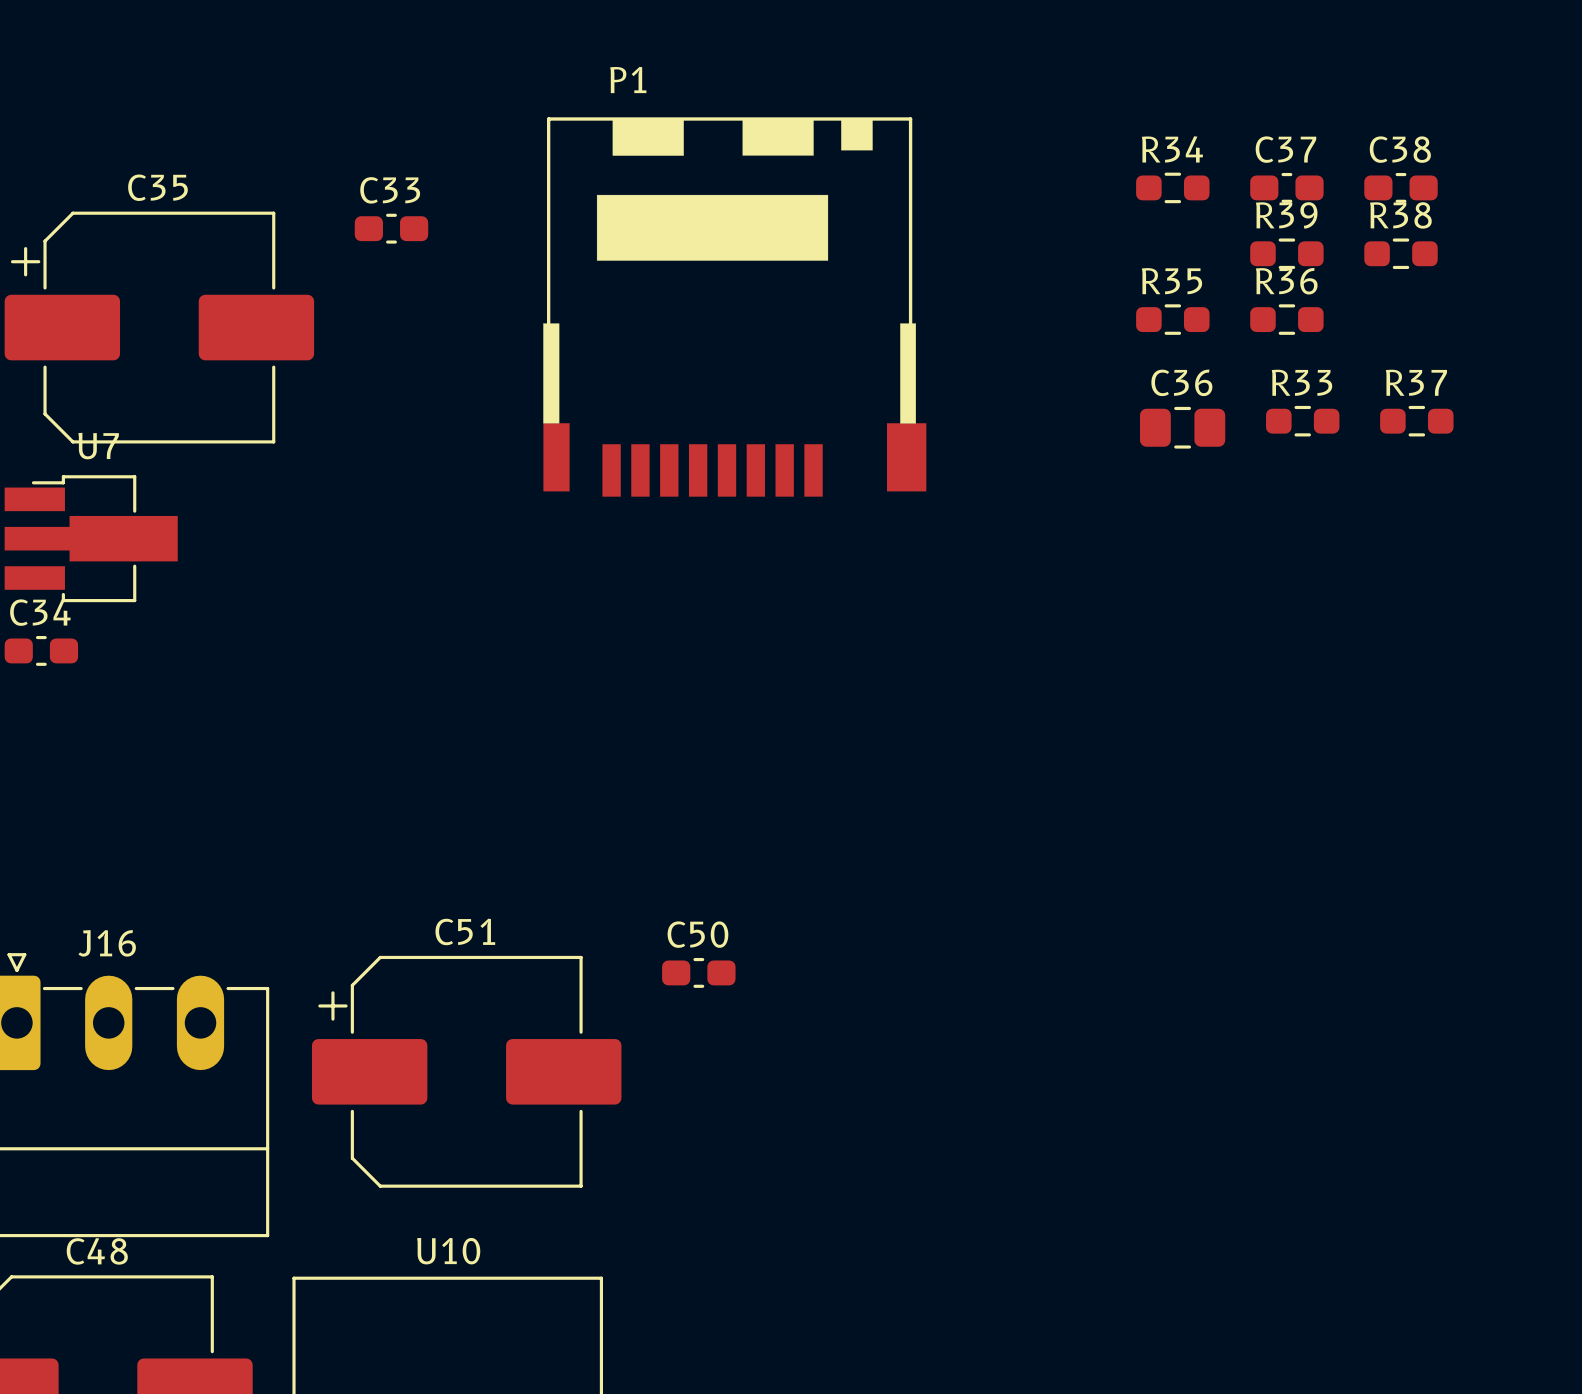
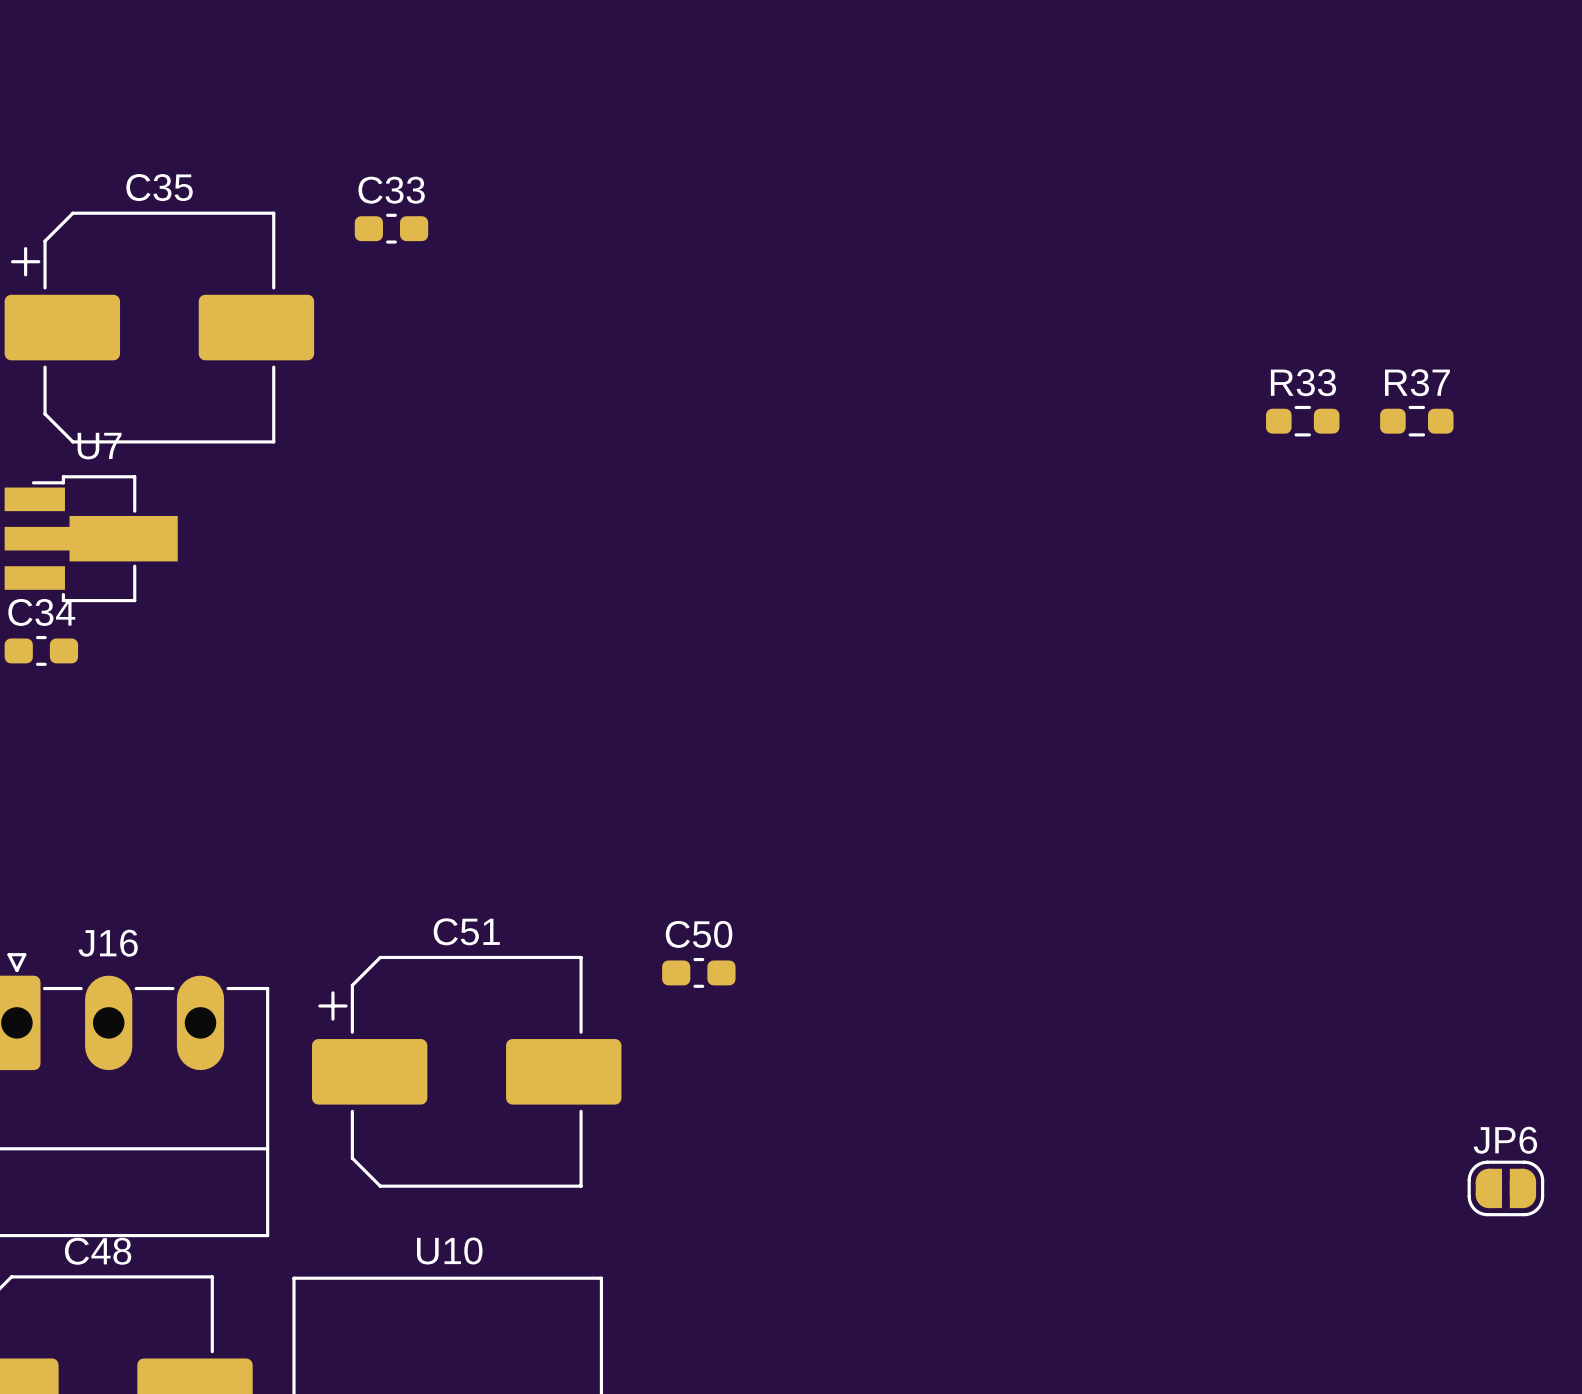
R34: (1172, 187) -> none
C37: (1286, 187) -> none
C38: (1401, 187) -> none
R39: (1286, 253) -> none
R38: (1401, 253) -> none
P1: (734, 307) -> none
R35: (1172, 319) -> none
R36: (1286, 319) -> none
C36: (1182, 427) -> none
JP6: none -> (1505, 1188)

